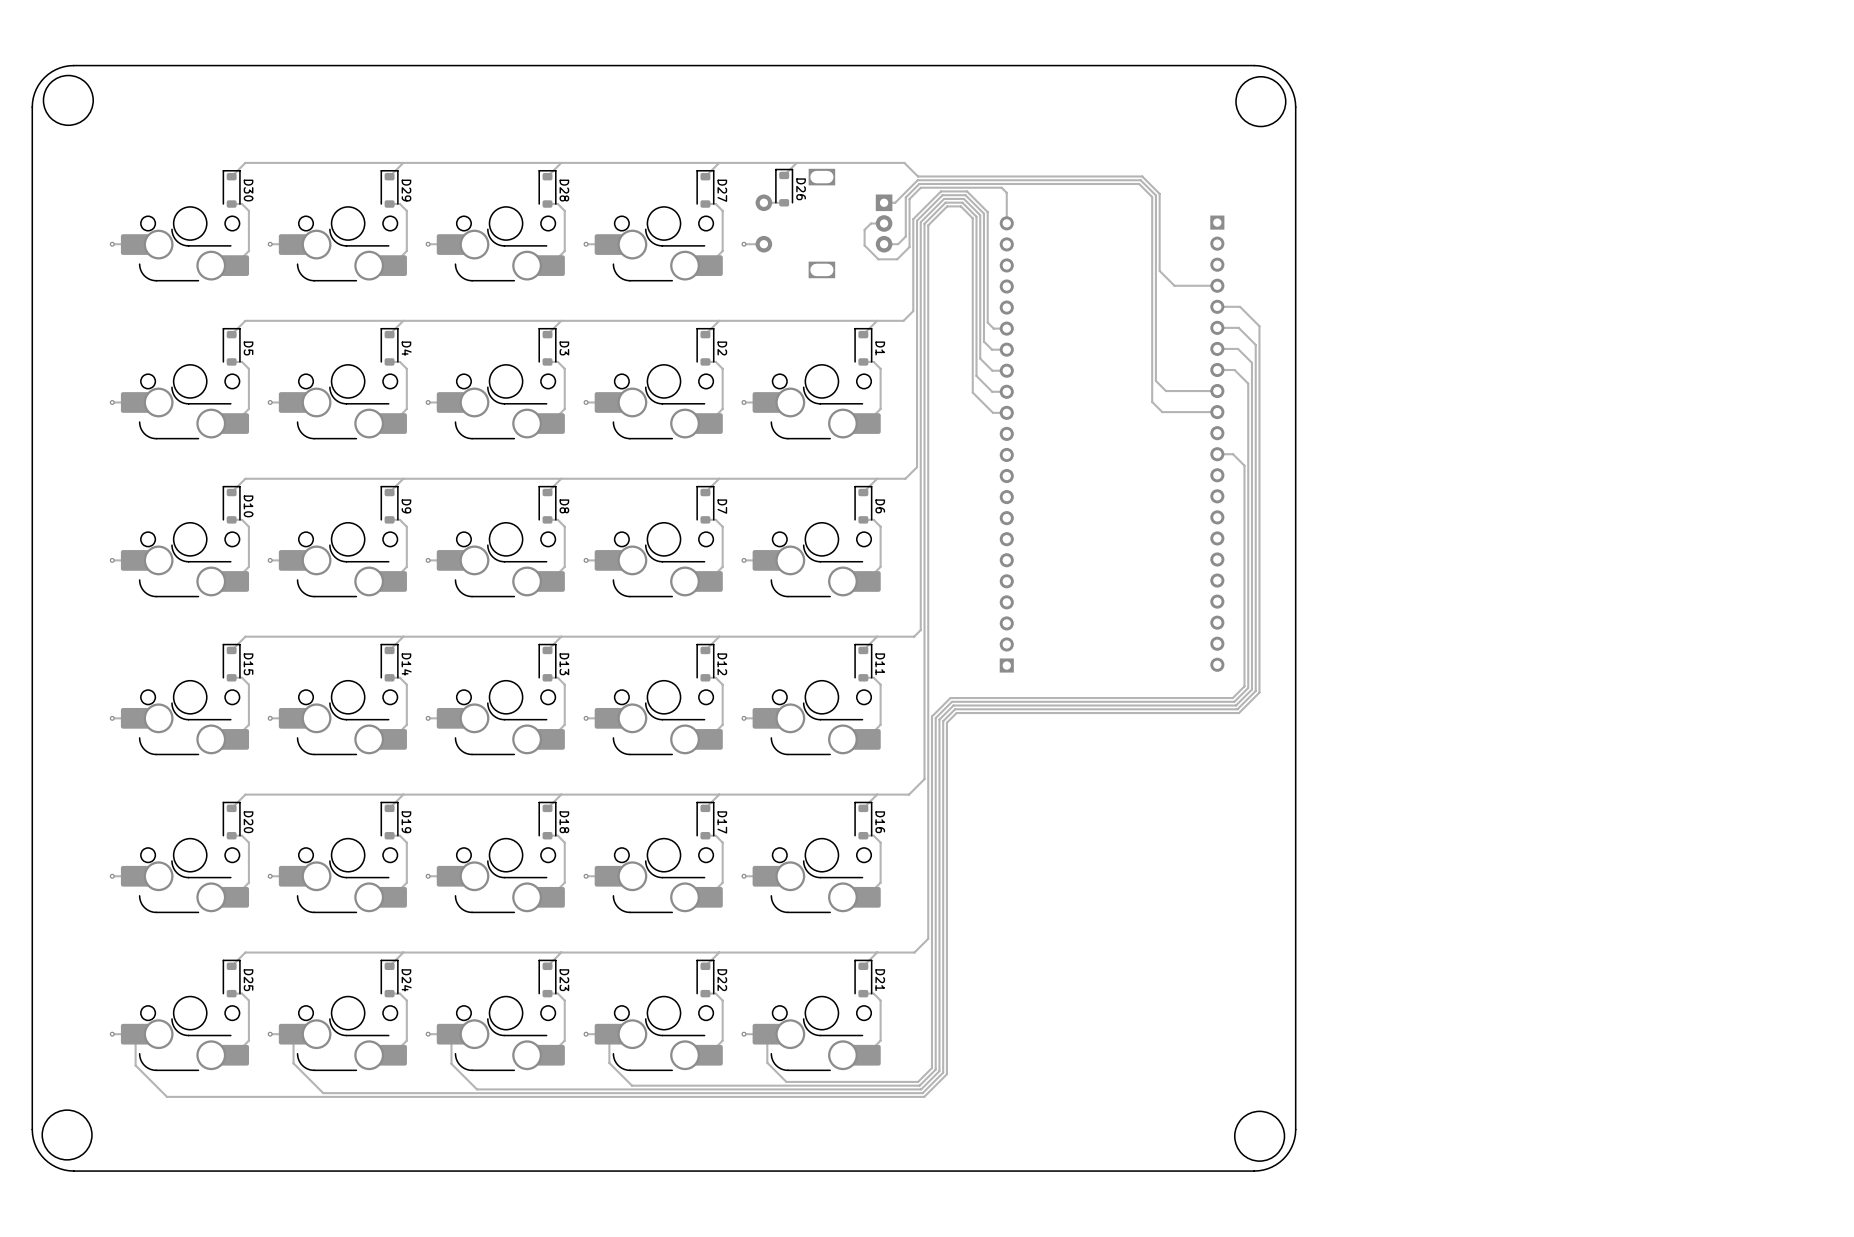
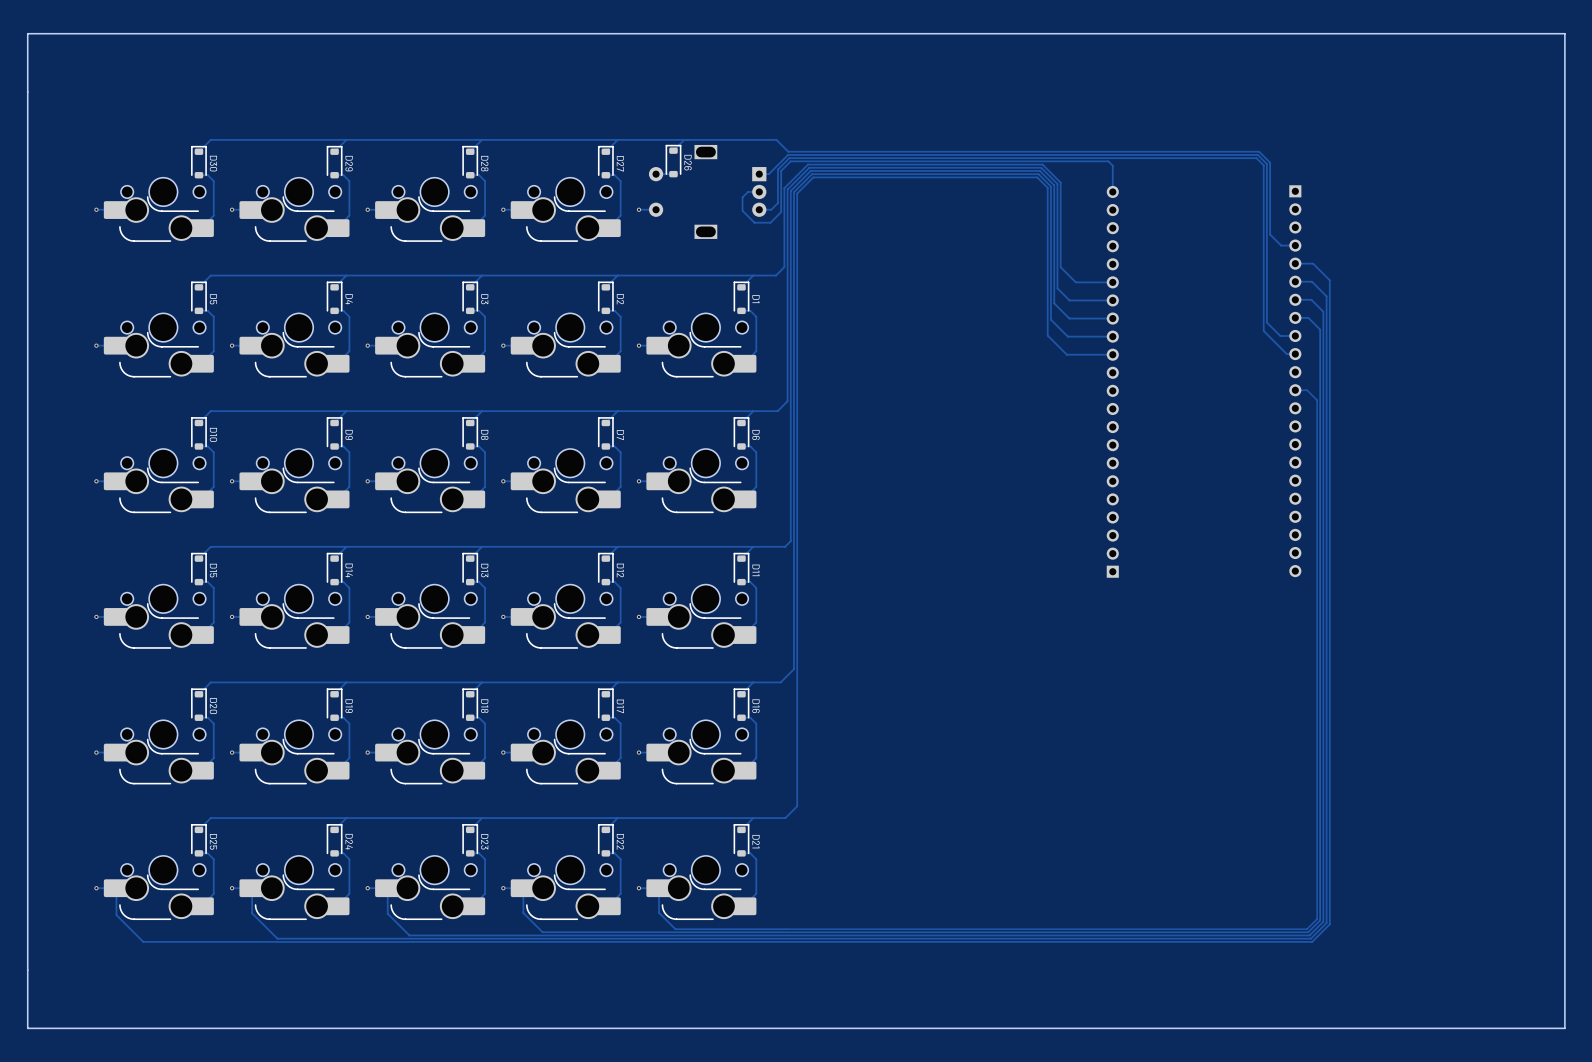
round board edge: [43, 75, 94, 126] -> none
round board edge: [1235, 76, 1286, 127] -> none
board edge: (32, 107) (36, 89) (44, 77) (60, 67) (73, 65) (1254, 65) (1272, 69) (1283, 77) (1291, 89) (1295, 107) (1295, 1129) (1291, 1147) (1280, 1162) (1267, 1168) (1254, 1171) (73, 1171) (55, 1166) (44, 1158) (36, 1147) (32, 1129) -> (27, 91) (27, 33) (1564, 33) (1564, 1028) (27, 1028) (27, 970)
track: (904, 162) (917, 176) (1142, 176) (1159, 193) (1159, 270) (1174, 285) (1219, 285) -> (776, 139) (788, 151) (1259, 151) (1270, 162) (1270, 234) (1281, 245) (1295, 245)
track: (917, 180) (1140, 180) (1155, 195) (1155, 380) (1166, 391) (1219, 391) -> (788, 154) (1257, 154) (1266, 164) (1266, 322) (1280, 335) (1295, 335)
track: (919, 184) (1139, 183) (1152, 196) (1152, 401) (1162, 412) (1219, 412) -> (789, 158) (1256, 158) (1263, 165) (1263, 331) (1286, 354) (1295, 354)
track: (920, 187) (1001, 187) (1006, 192) (1006, 223) -> (790, 161) (1108, 161) (1112, 165) (1112, 191)
track: (940, 191) (967, 191) (987, 212) (987, 322) (993, 328) (1006, 328) -> (808, 164) (1042, 164) (1060, 182) (1060, 267) (1075, 282) (1112, 282)
track: (942, 195) (965, 195) (983, 213) (983, 341) (992, 349) (1006, 349) -> (809, 167) (1041, 167) (1057, 183) (1057, 288) (1069, 300) (1112, 300)
track: (943, 199) (963, 198) (980, 215) (980, 358) (992, 370) (1006, 370) -> (810, 170) (1039, 170) (1054, 185) (1054, 303) (1069, 318) (1112, 318)
track: (945, 202) (962, 202) (976, 216) (976, 376) (992, 391) (1006, 391) -> (812, 174) (1038, 174) (1050, 186) (1050, 319) (1067, 336) (1112, 336)
track: (947, 206) (960, 206) (972, 218) (972, 392) (993, 412) (1006, 412) -> (813, 177) (1037, 177) (1047, 187) (1047, 335) (1066, 354) (1112, 354)
track: (1219, 306) (1240, 306) (1259, 326) (1259, 692) (1239, 713) (956, 713) (946, 722) (946, 1074) (924, 1096) (166, 1096) -> (1295, 263) (1313, 263) (1329, 280) (1329, 924) (1312, 941) (143, 941)
track: (1219, 327) (1238, 327) (1255, 344) (1255, 691) (1237, 709) (955, 709) (943, 721) (943, 1072) (922, 1093) (323, 1092) -> (1295, 281) (1312, 281) (1326, 296) (1326, 923) (1310, 938) (277, 938)
track: (1219, 348) (1238, 348) (1251, 362) (1251, 689) (1235, 705) (953, 705) (939, 719) (939, 1071) (921, 1089) (476, 1089) -> (1295, 299) (1311, 299) (1323, 311) (1323, 921) (1309, 935) (409, 935)
track: (1219, 369) (1234, 369) (1248, 383) (1248, 687) (1234, 701) (952, 701) (935, 718) (935, 1069) (919, 1085) (631, 1085) -> (1295, 317) (1308, 317) (1320, 329) (1320, 920) (1308, 932) (542, 932)
part rotation: 0° (1217, 443) -> 180° (1112, 381)
part: none -> (1295, 381)
part: (1006, 444) -> none
track: (1219, 454) (1233, 454) (1244, 465) (1244, 686) (1232, 698) (950, 698) (931, 716) (931, 1068) (918, 1081) -> (1307, 929) (788, 929)
track: none -> (1295, 390) (1307, 390) (1317, 400) (1317, 919)
track: none -> (1317, 919) (1307, 929)
round board edge: [42, 1109, 93, 1161] -> none
round board edge: [1234, 1111, 1285, 1162] -> none

